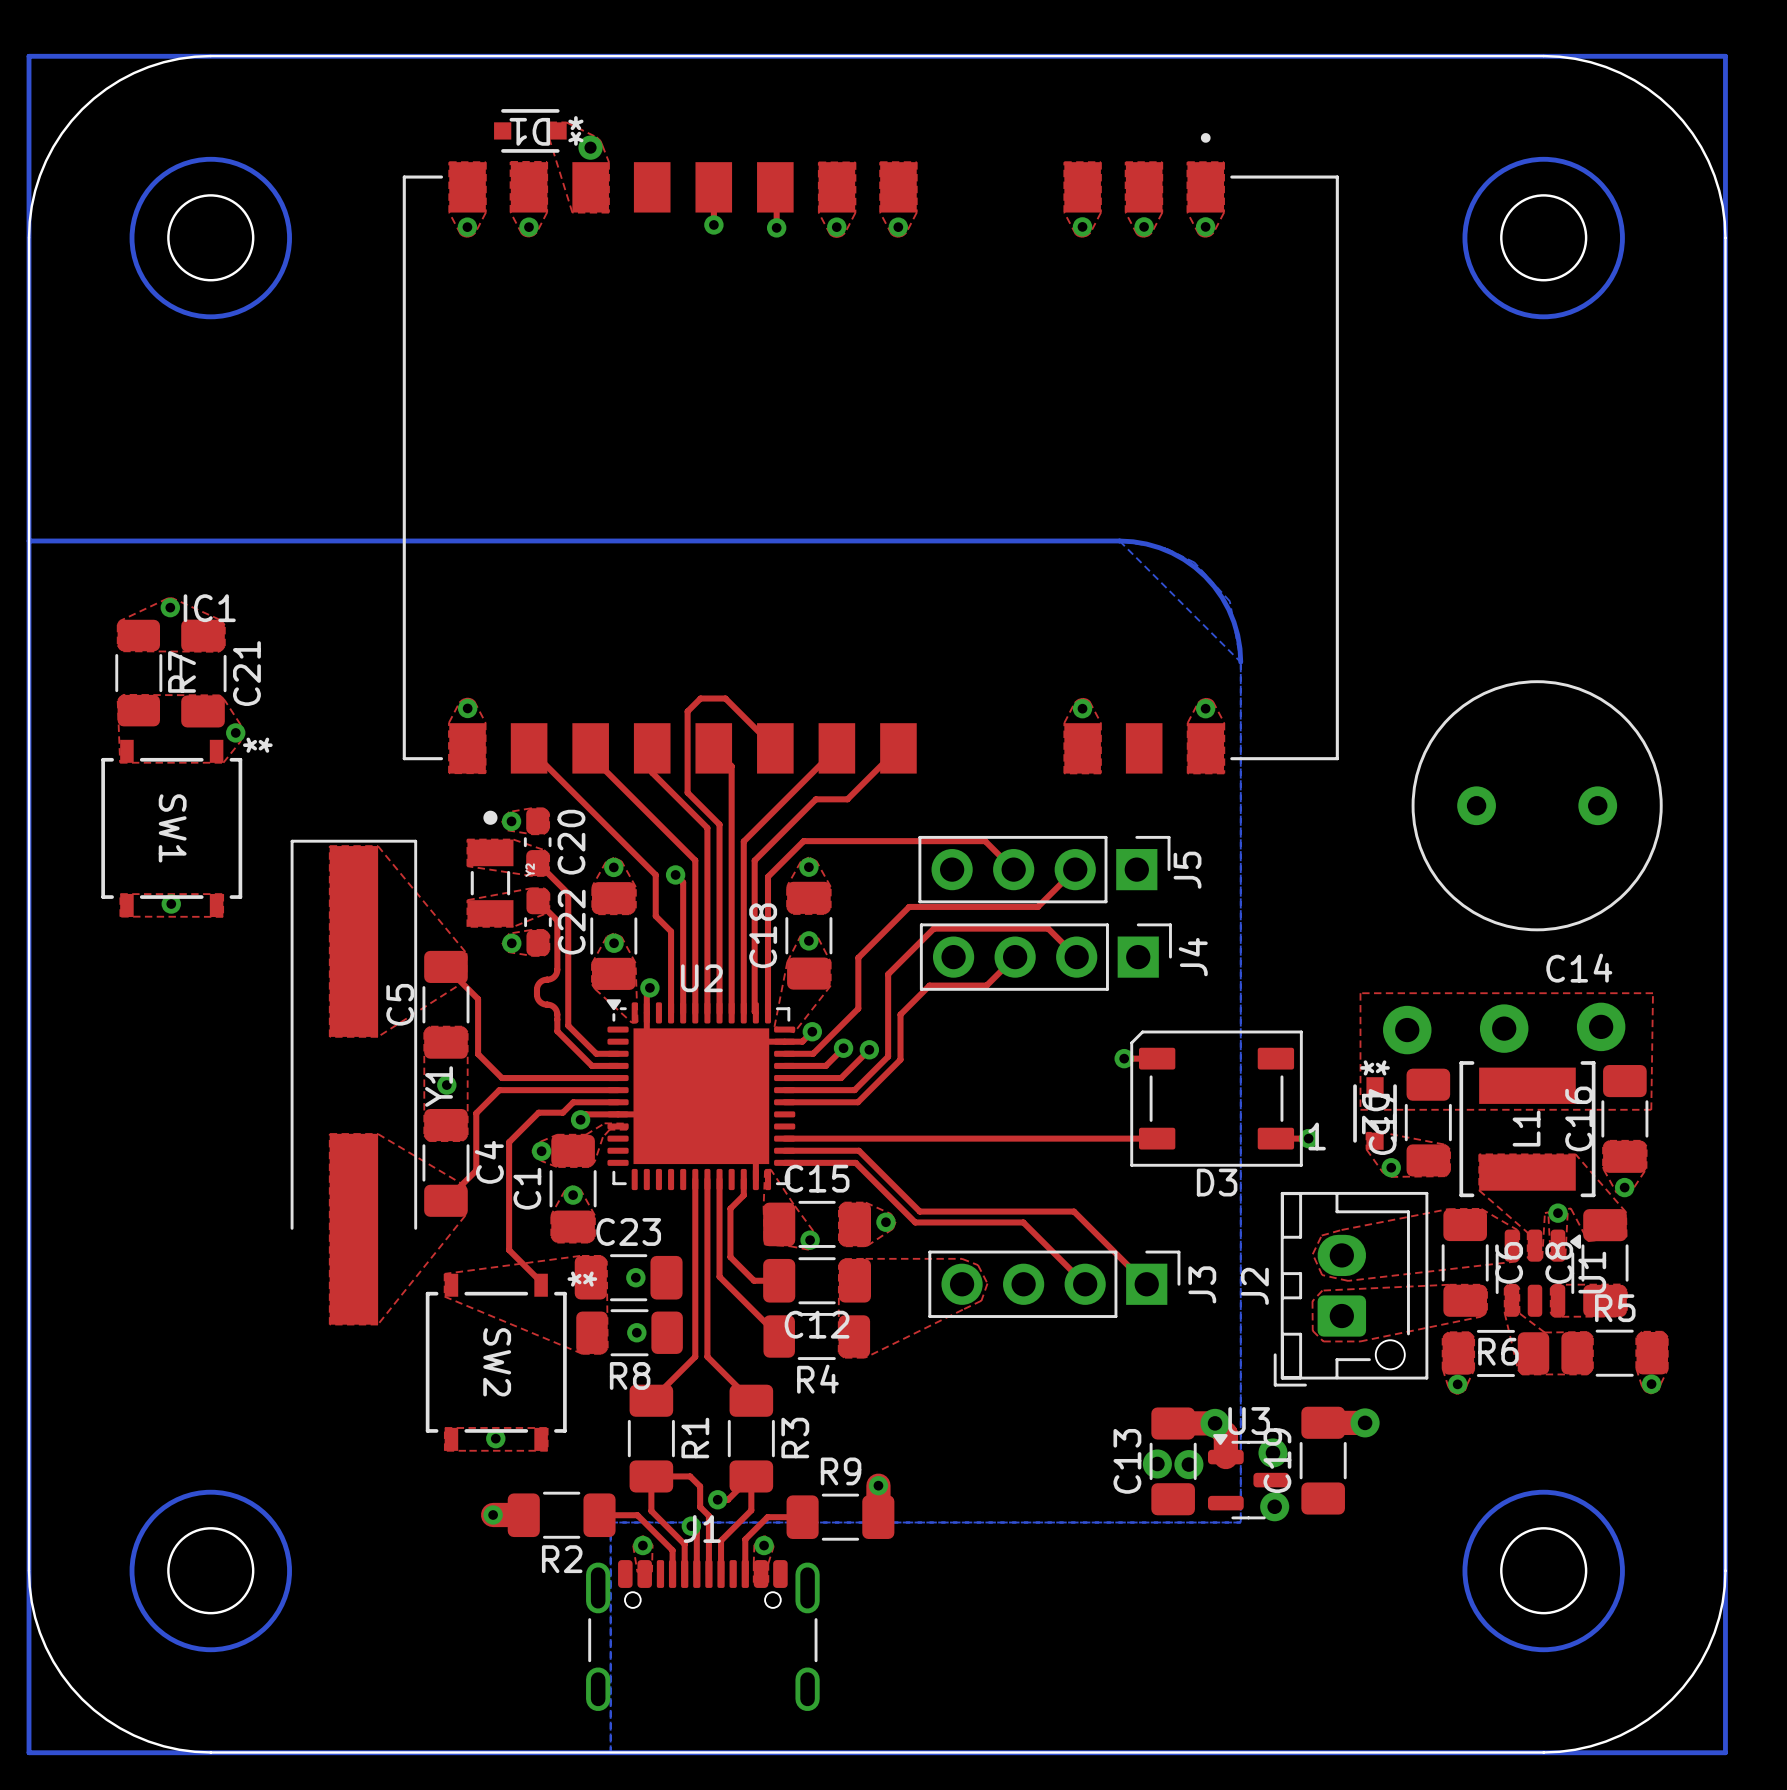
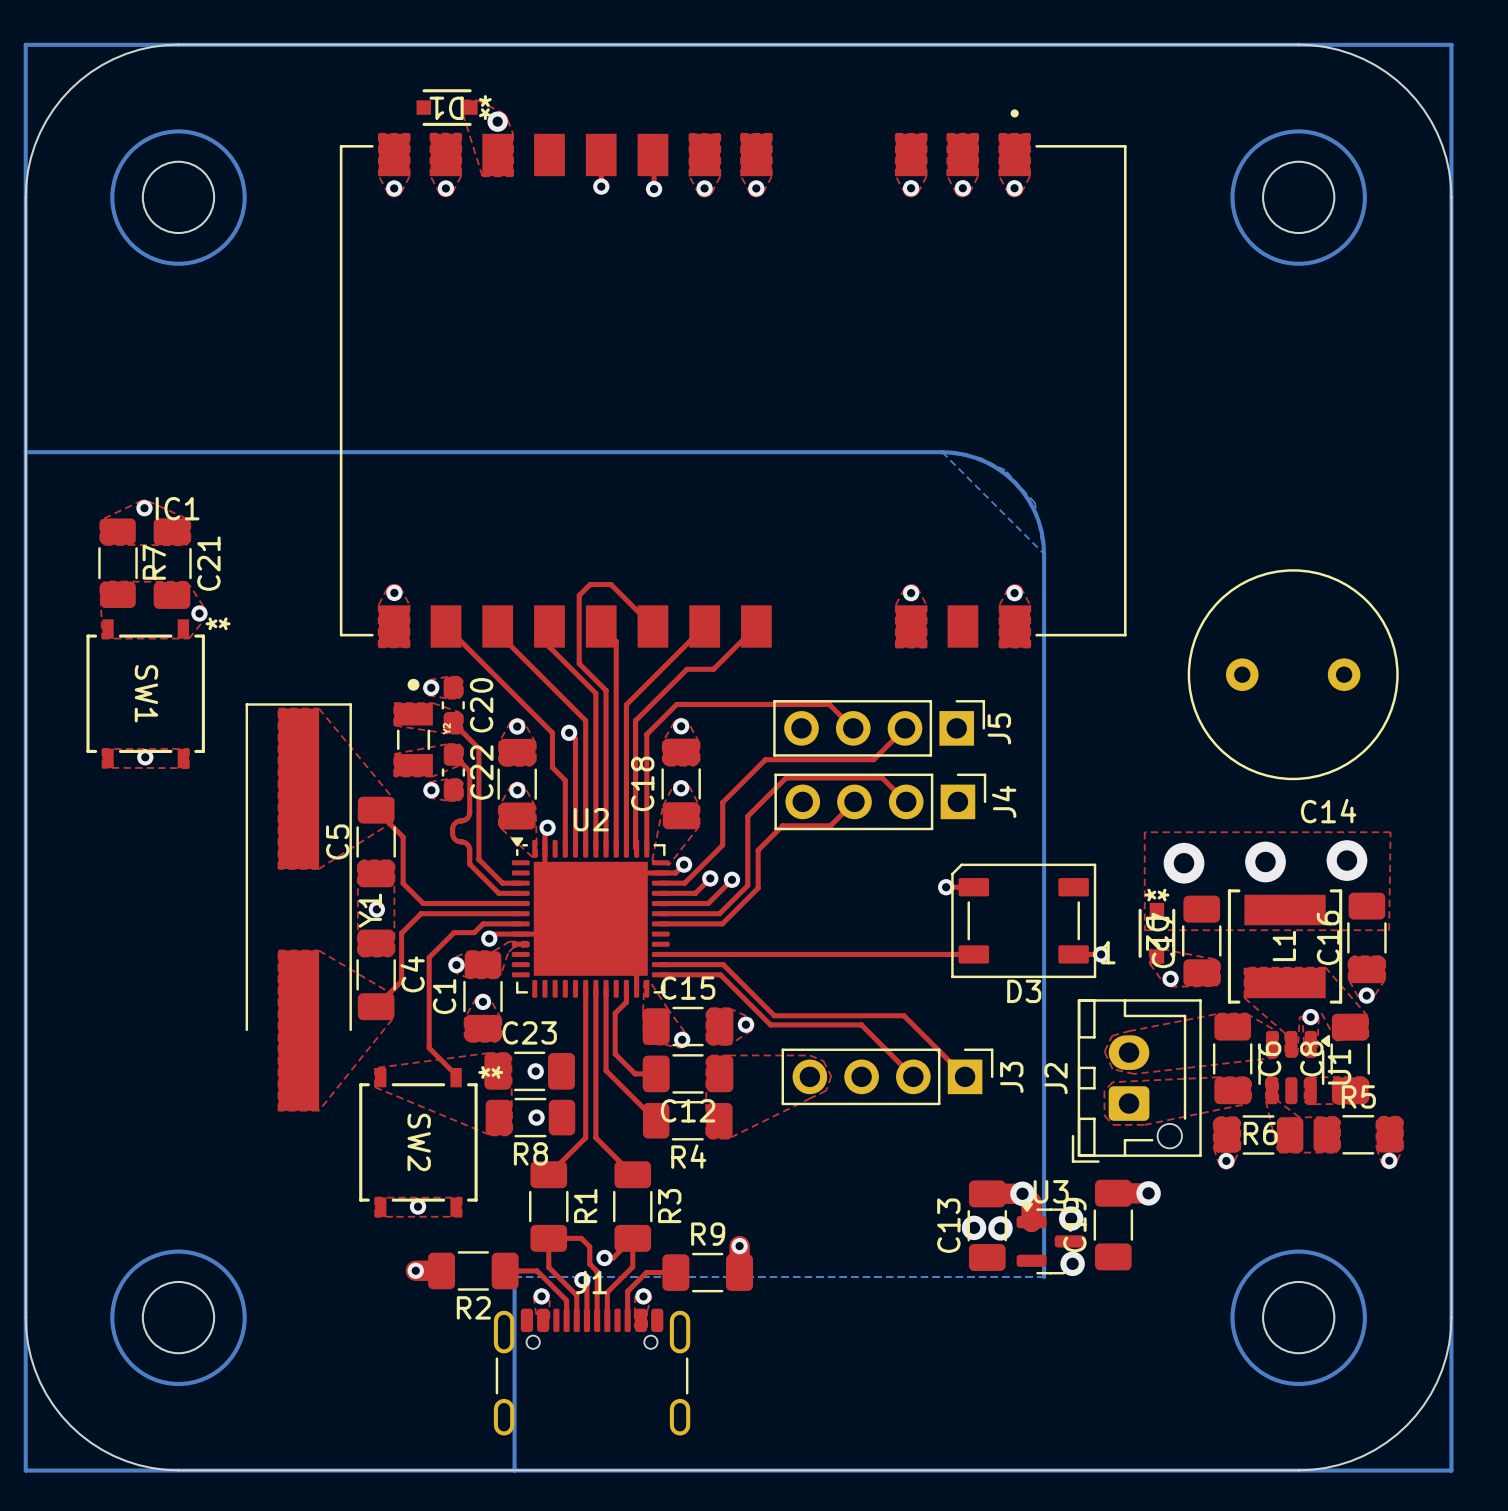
bottom track: none -> (1044, 554) (1044, 1277)
bottom track: none -> (514, 1277) (514, 1470)

